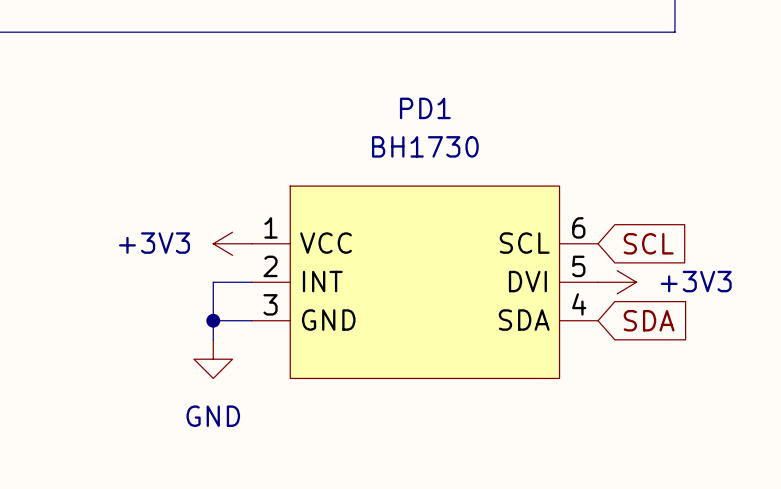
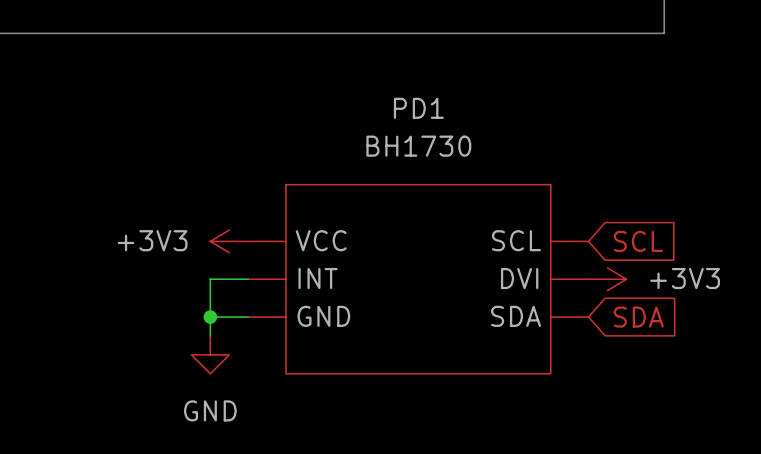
PD1 pin number: 1 (270, 227) -> none
PD1 pin number: 6 (578, 227) -> none
PD1 pin number: 2 (270, 266) -> none
PD1 pin number: 5 (578, 266) -> none
PD1 pin number: 3 (270, 304) -> none
PD1 pin number: 4 (579, 304) -> none

